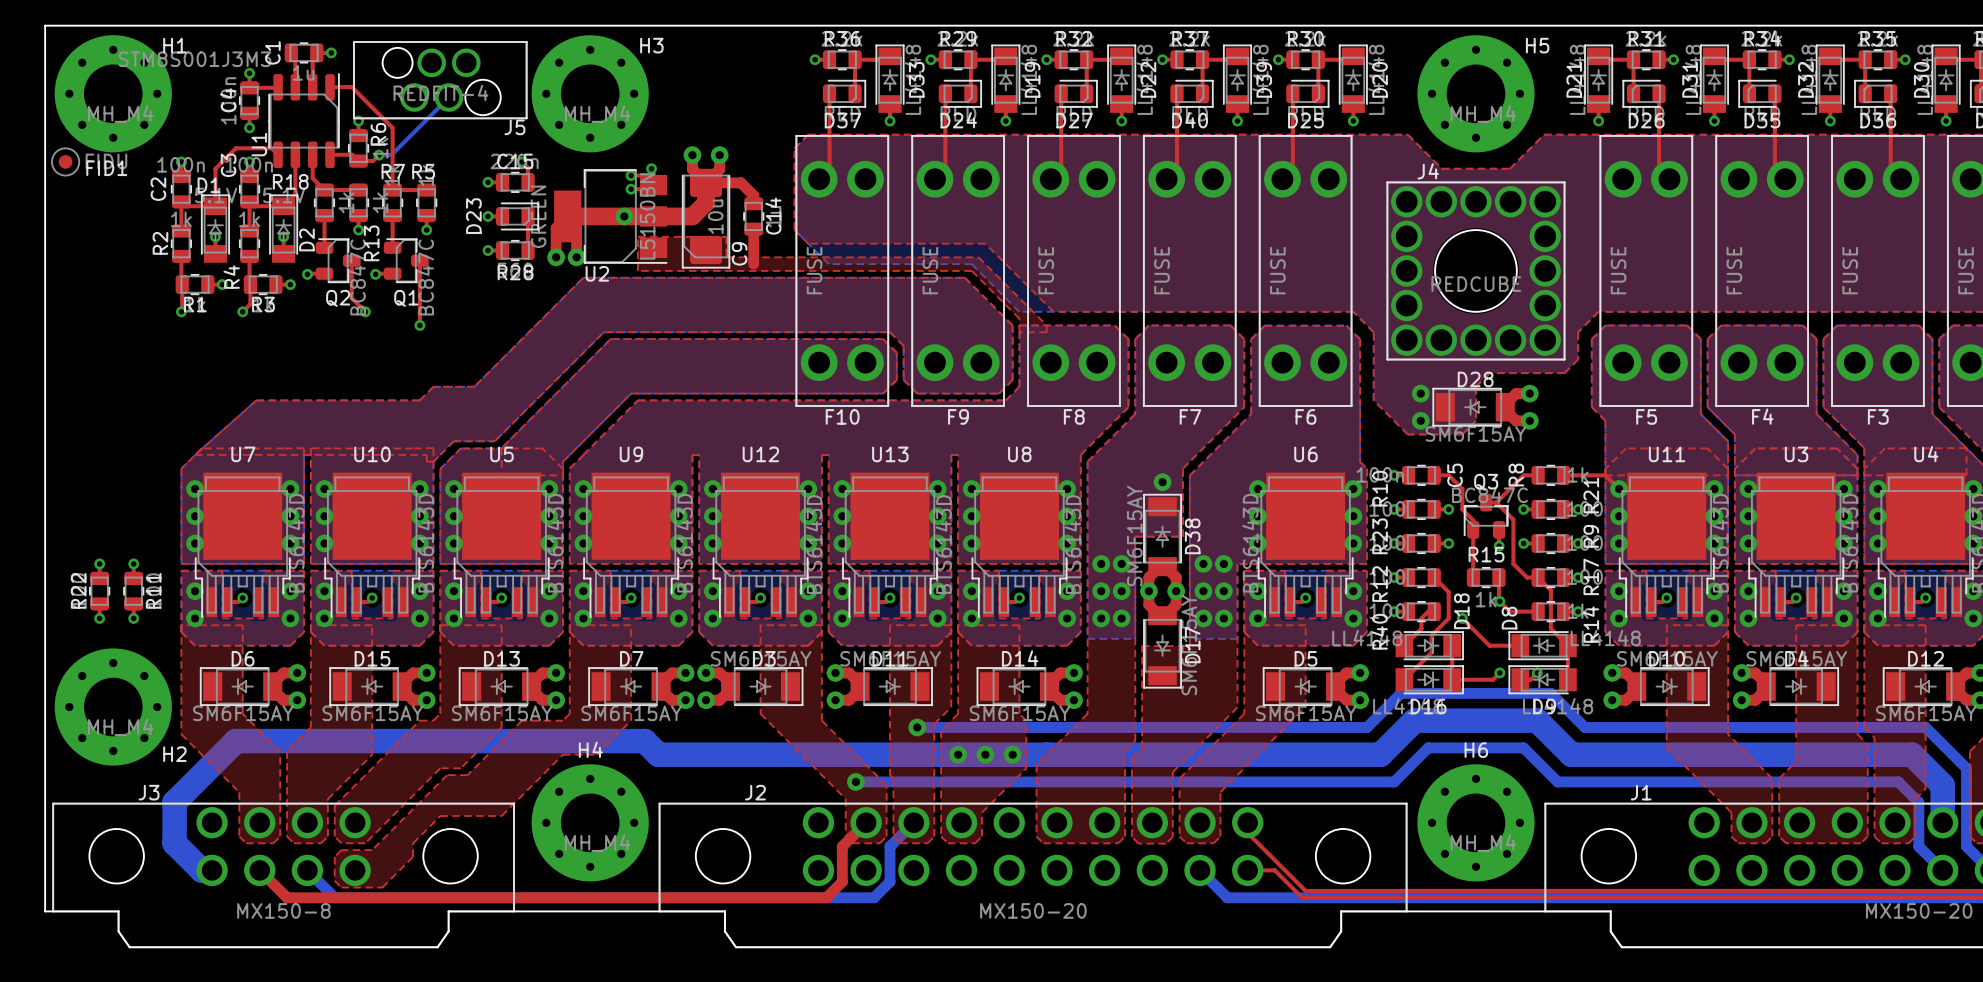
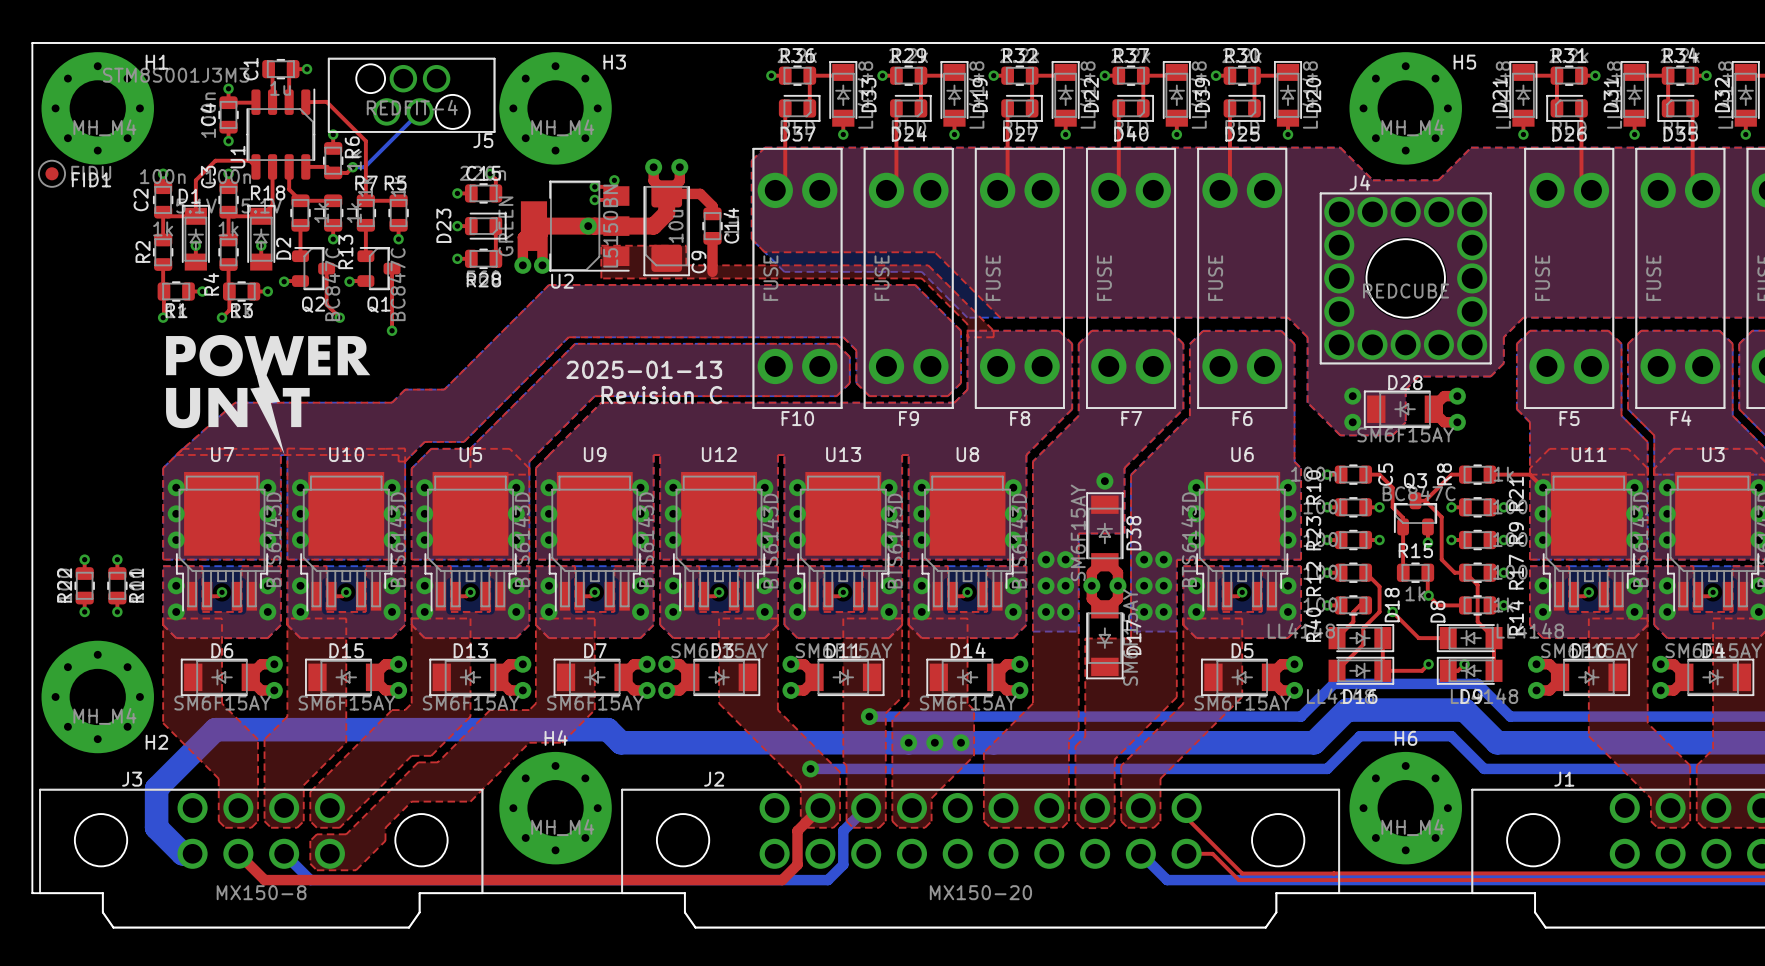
drawing: none -> [166, 334, 371, 455]
text: none -> 2025-01-13 (644, 369)
text: none -> Revision C (661, 395)

